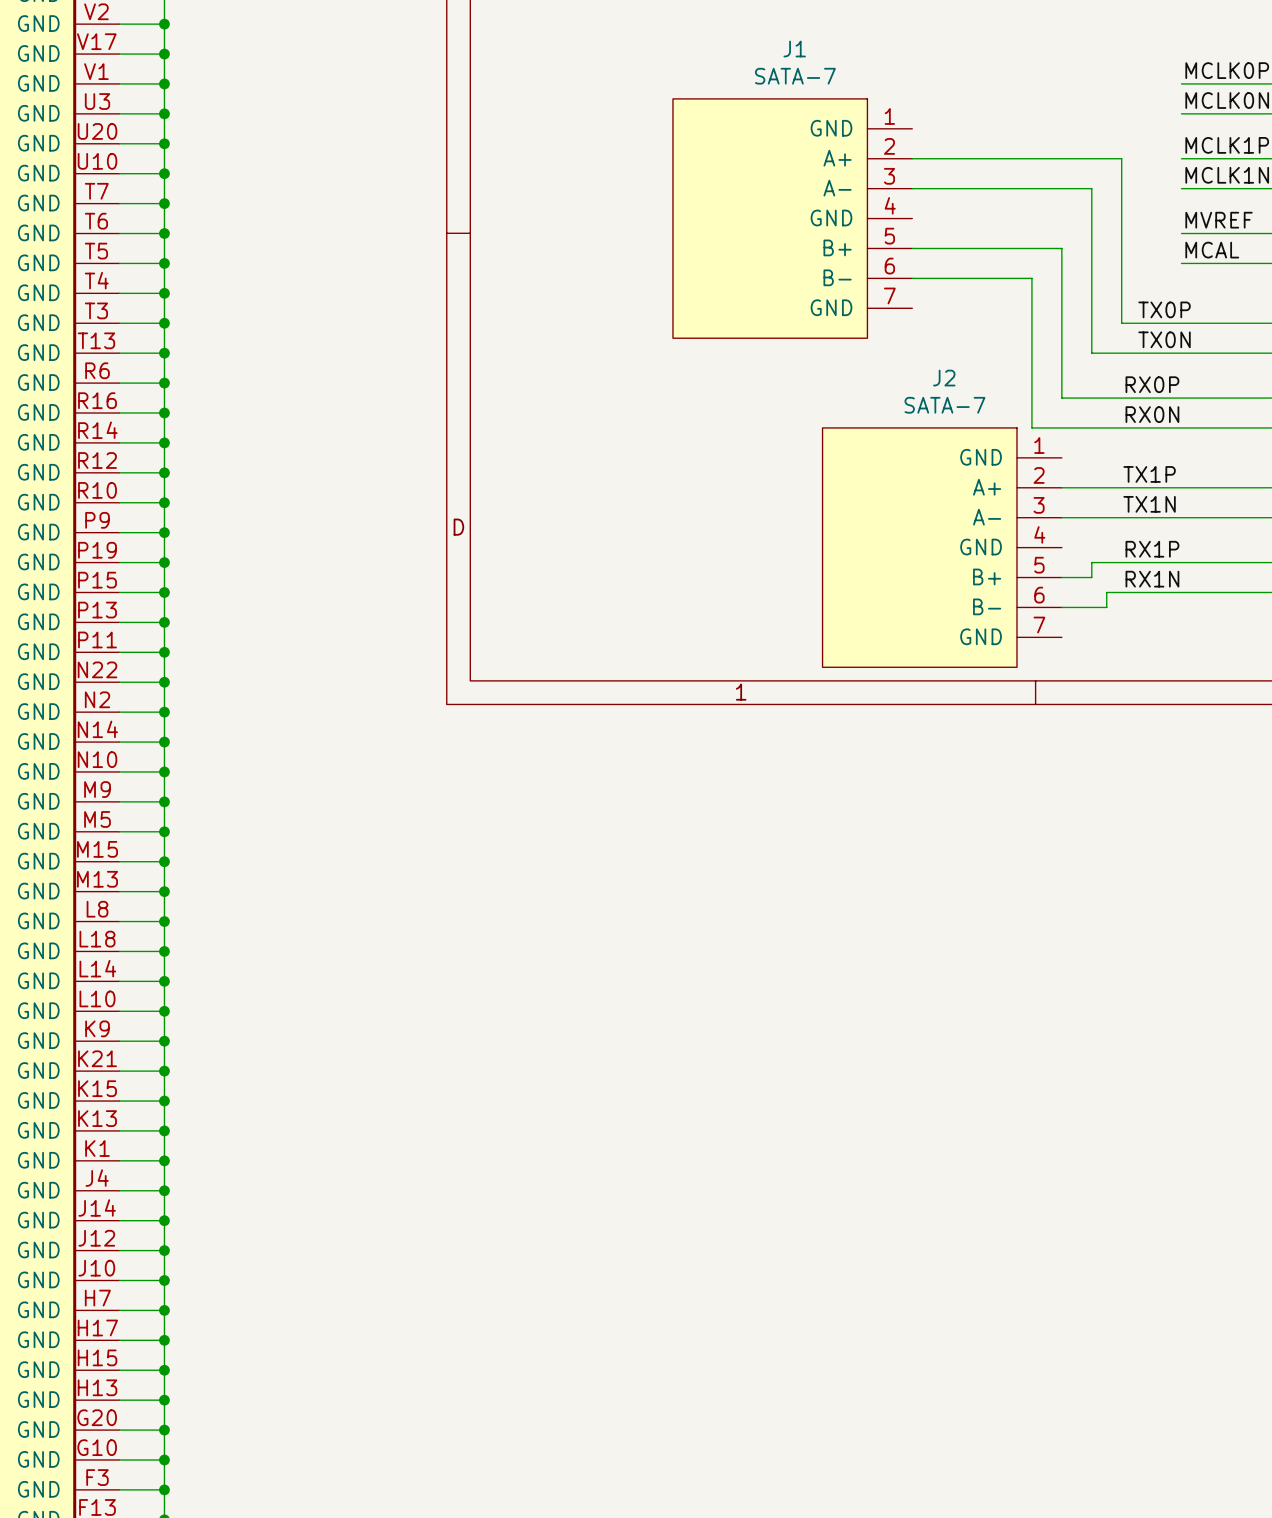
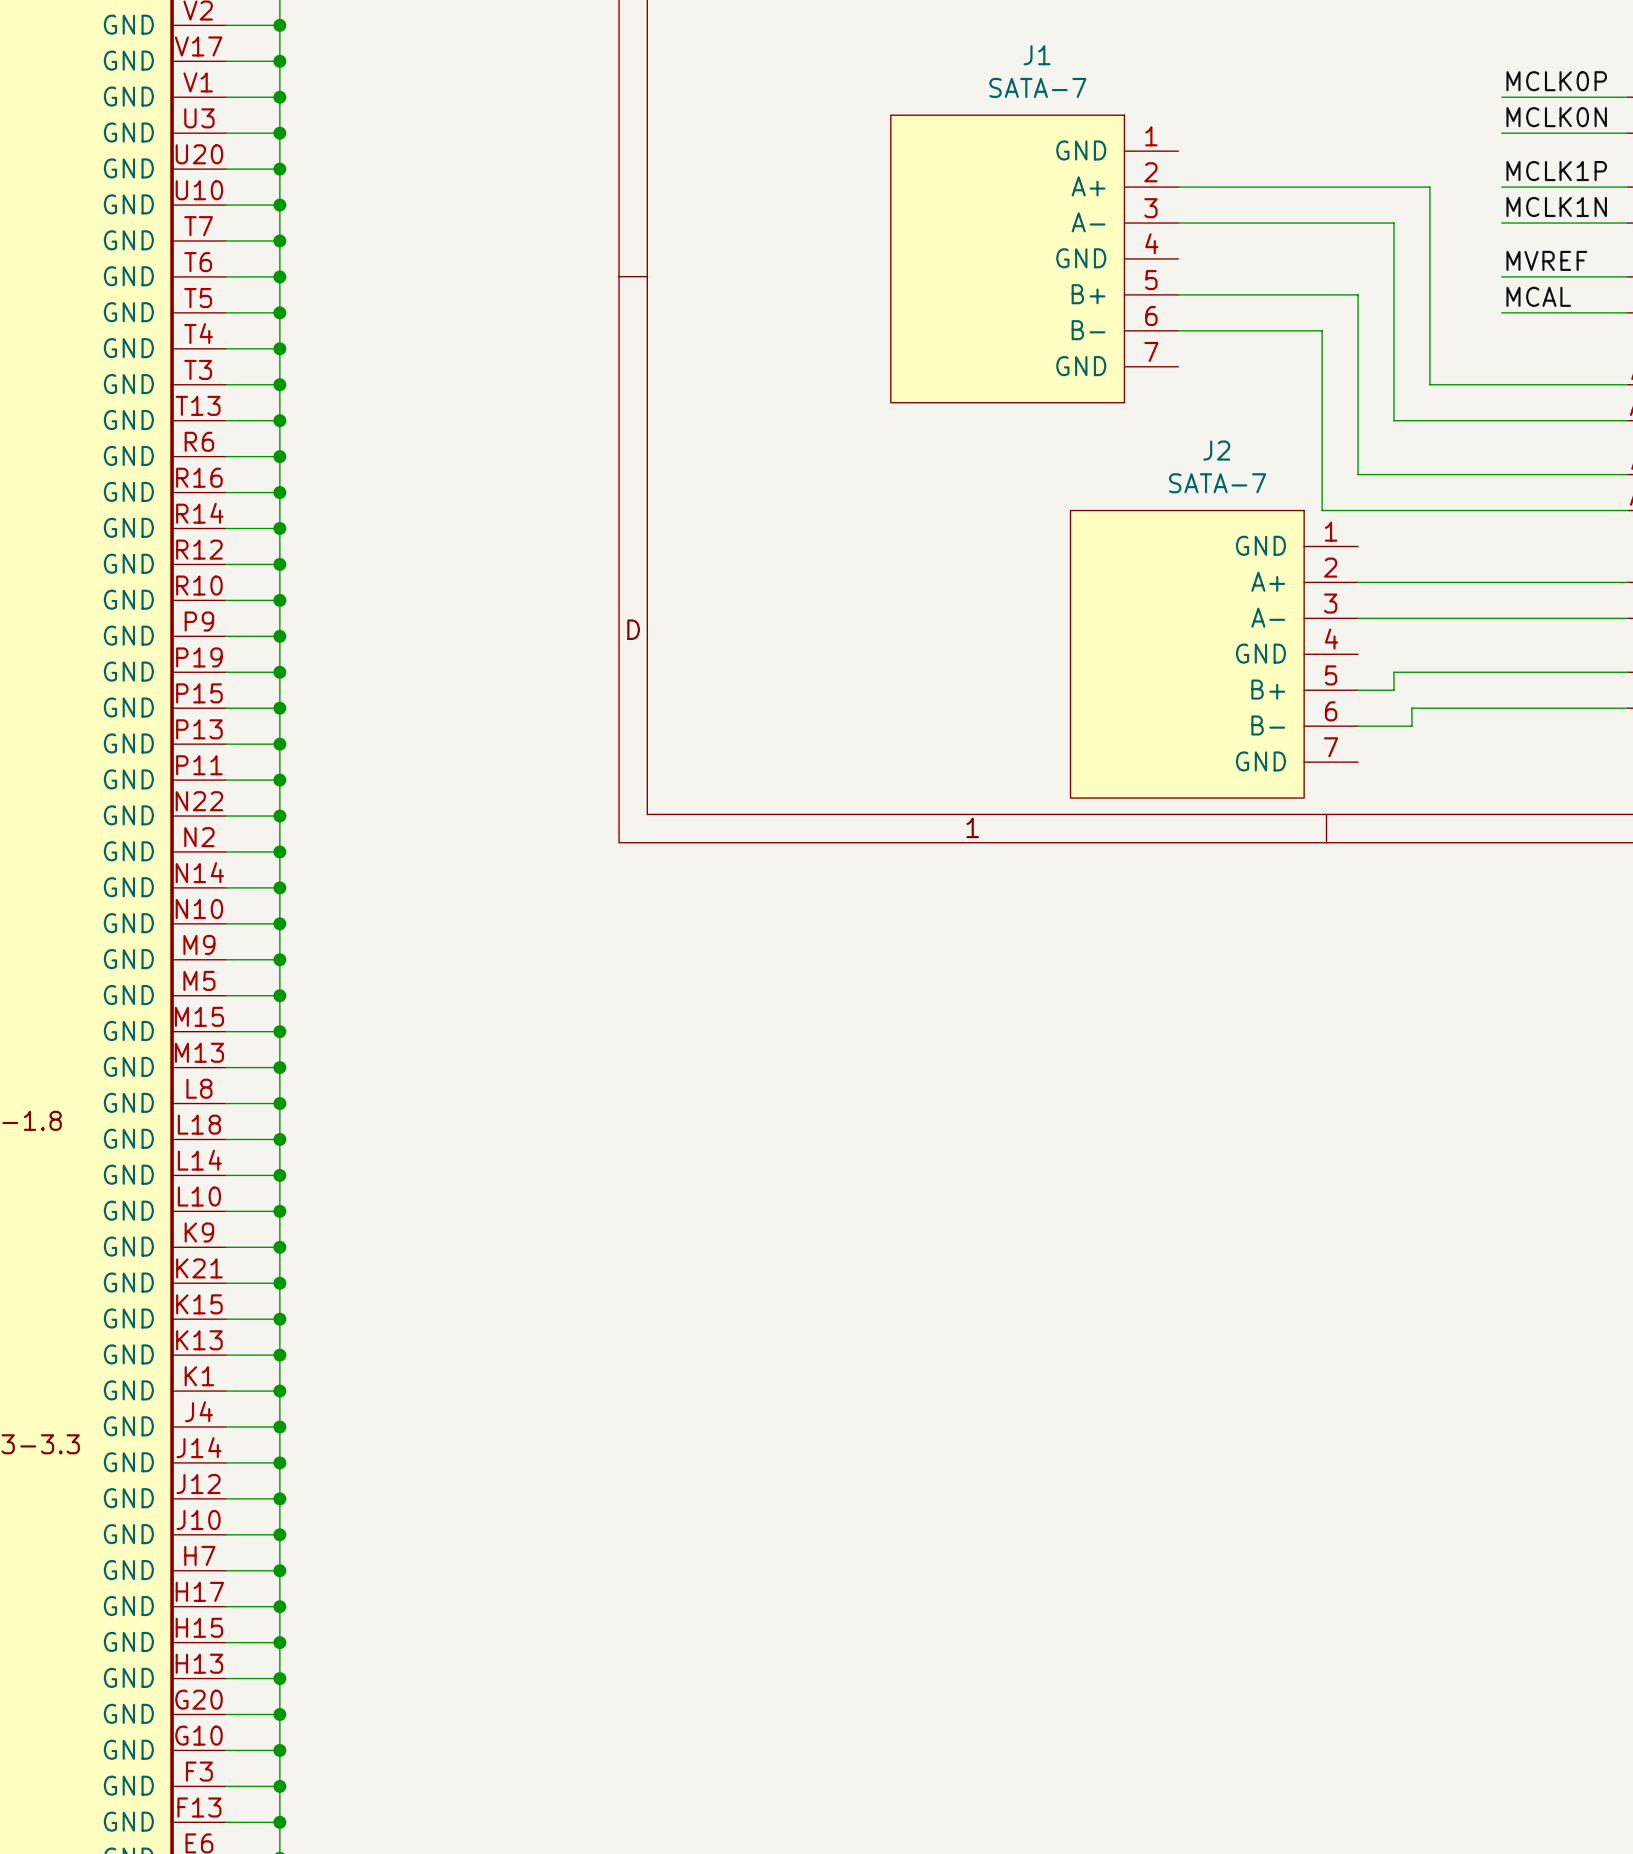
label: TX0P (1164, 309) -> none
label: TX0N (1164, 339) -> none
label: RX0P (1152, 384) -> none
label: RX0N (1152, 414) -> none
label: TX1P (1149, 474) -> none
label: TX1N (1149, 504) -> none
label: RX1P (1152, 549) -> none
label: RX1N (1152, 579) -> none

